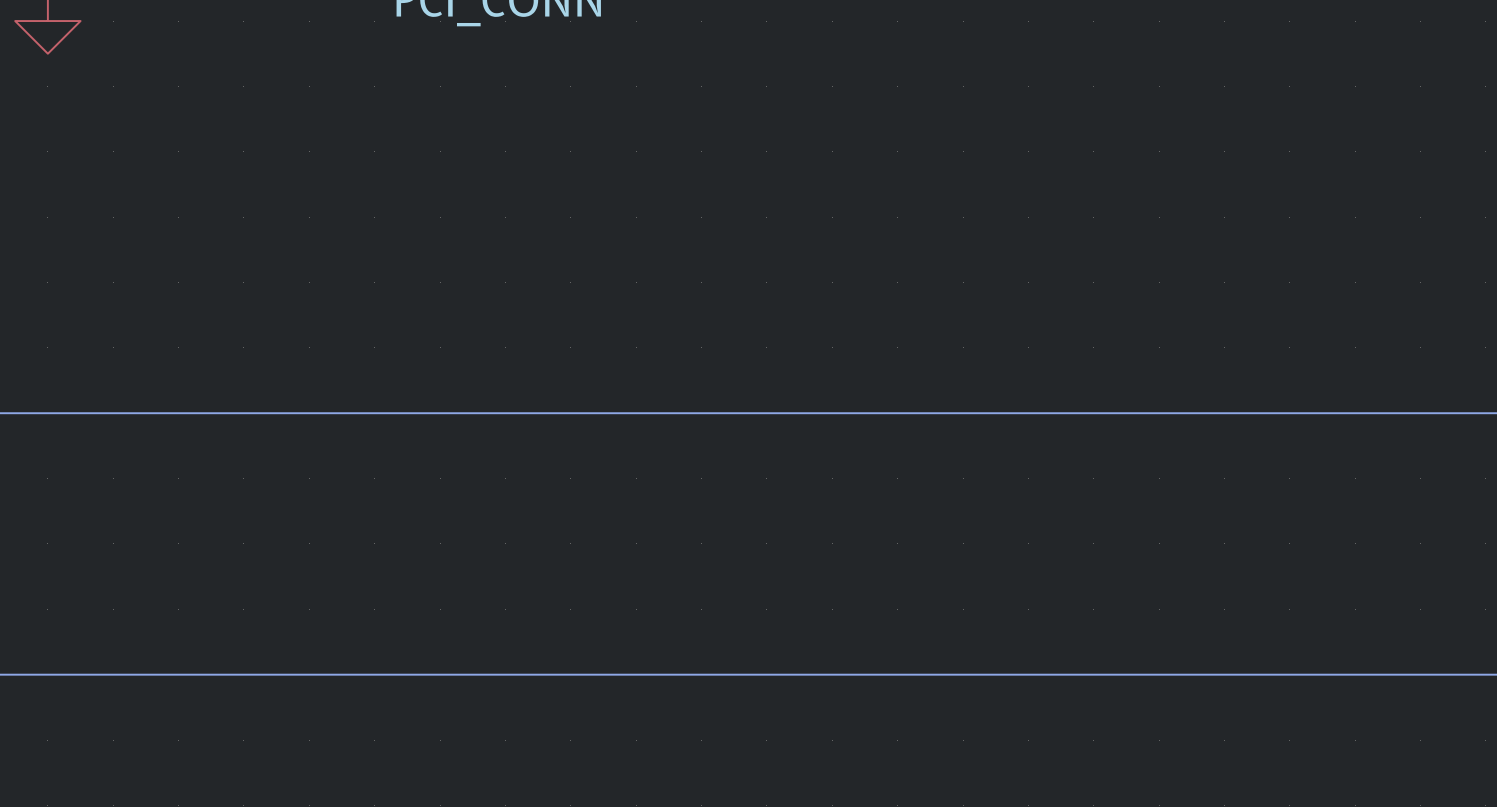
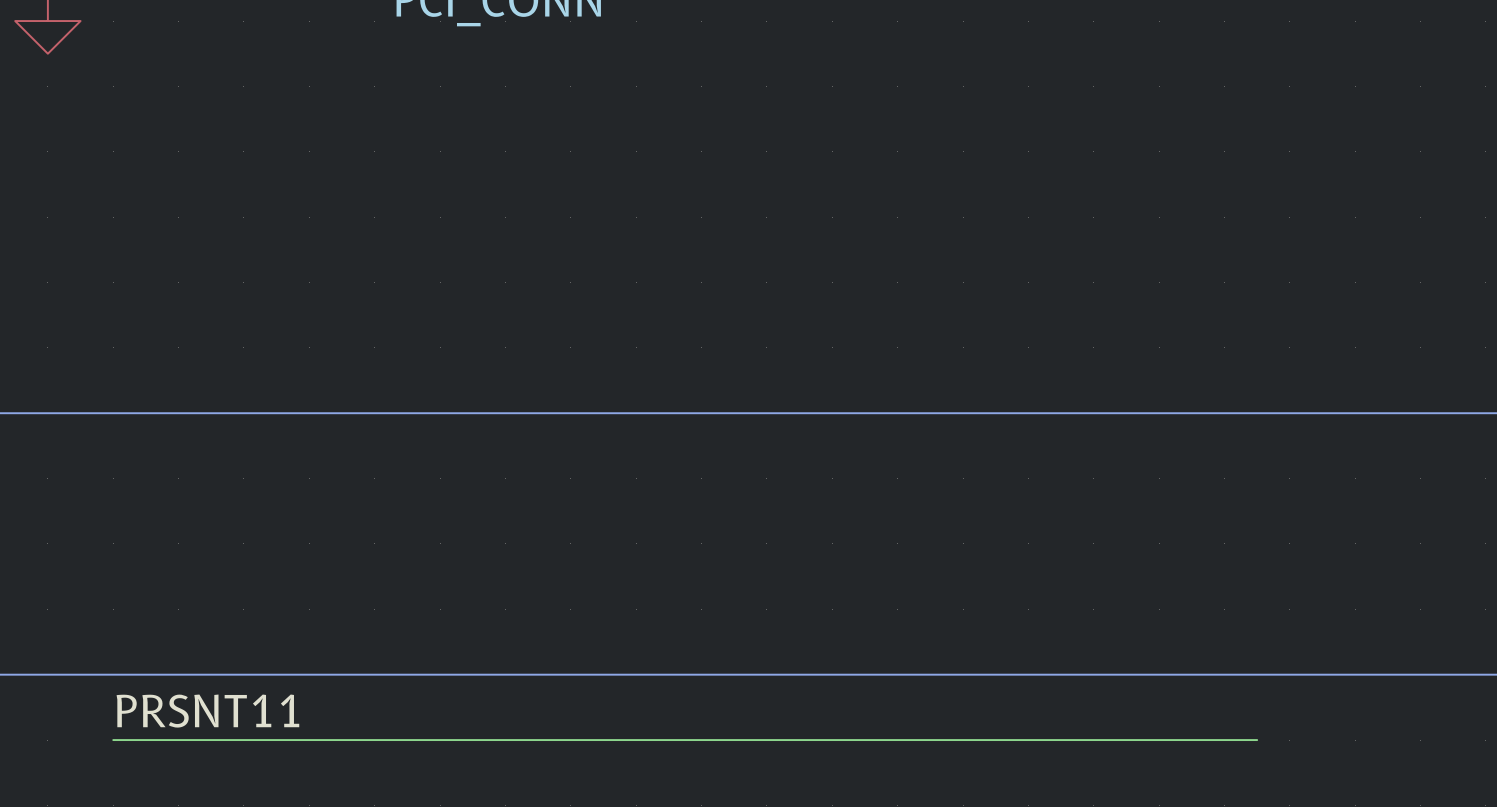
label: none -> PRSNT11 (207, 711)
wire: none -> (113, 740) (1257, 740)

